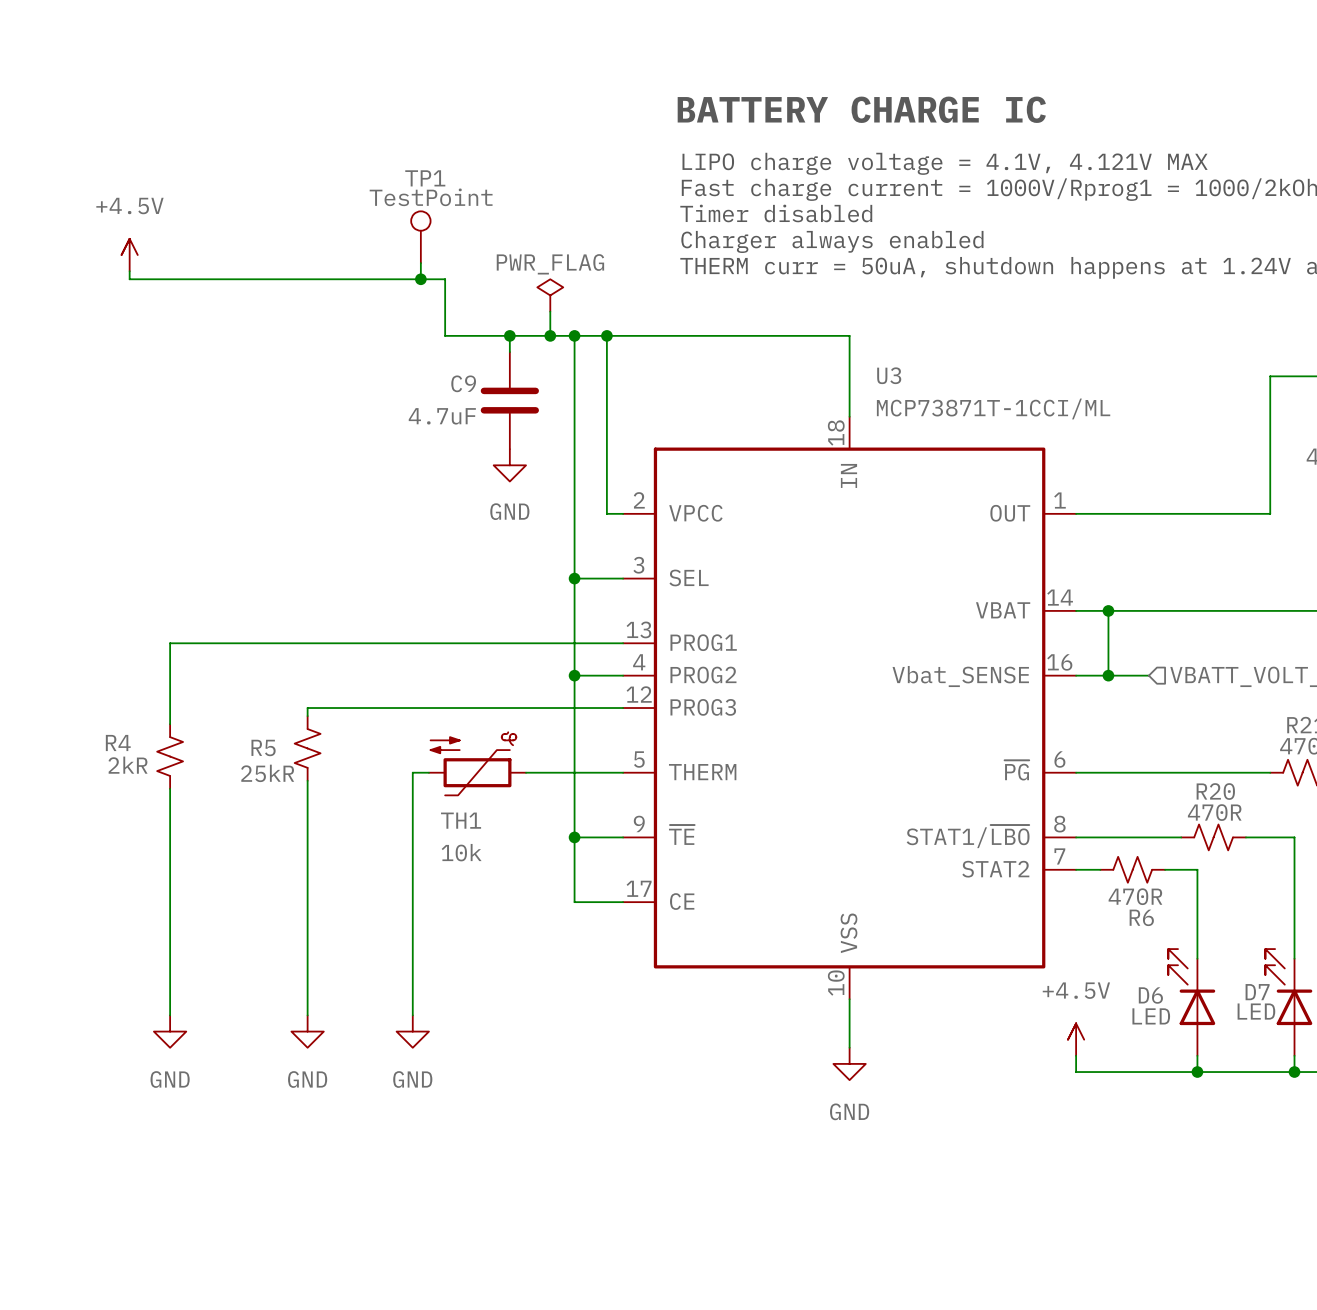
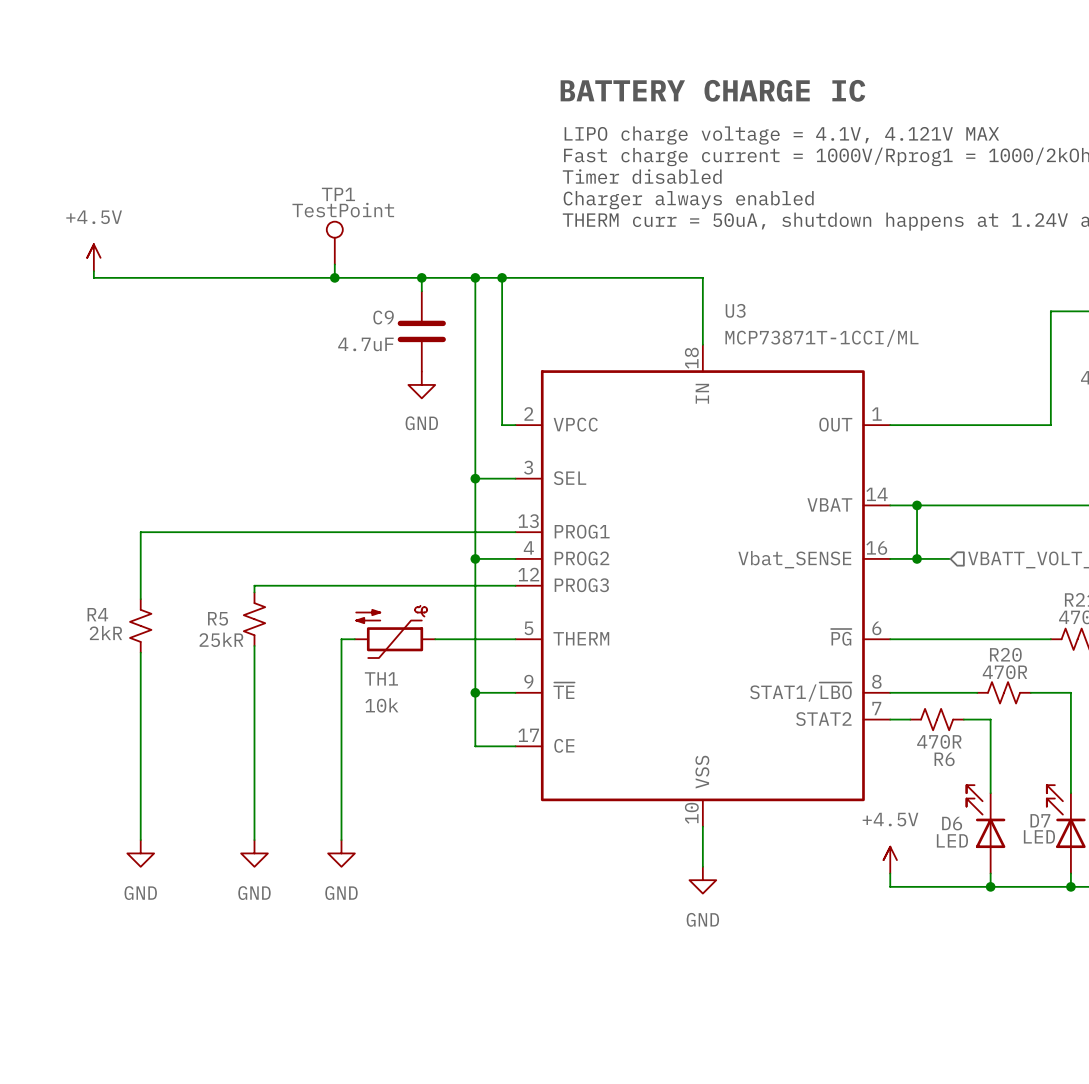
TP1 position: (420, 237) -> (334, 243)
power symbol position: +4.5V (129, 255) -> +4.5V (93, 257)
wire: (420, 263) (420, 279) -> (334, 264) (334, 277)
wire: (129, 271) (129, 279) (445, 279) (445, 335) -> (93, 271) (93, 277) (368, 277)
junction position: (420, 279) -> (334, 277)
power symbol: PWR_FLAG (550, 295) -> none
wire: (550, 311) (550, 335) -> none
junction: (550, 335) -> none

